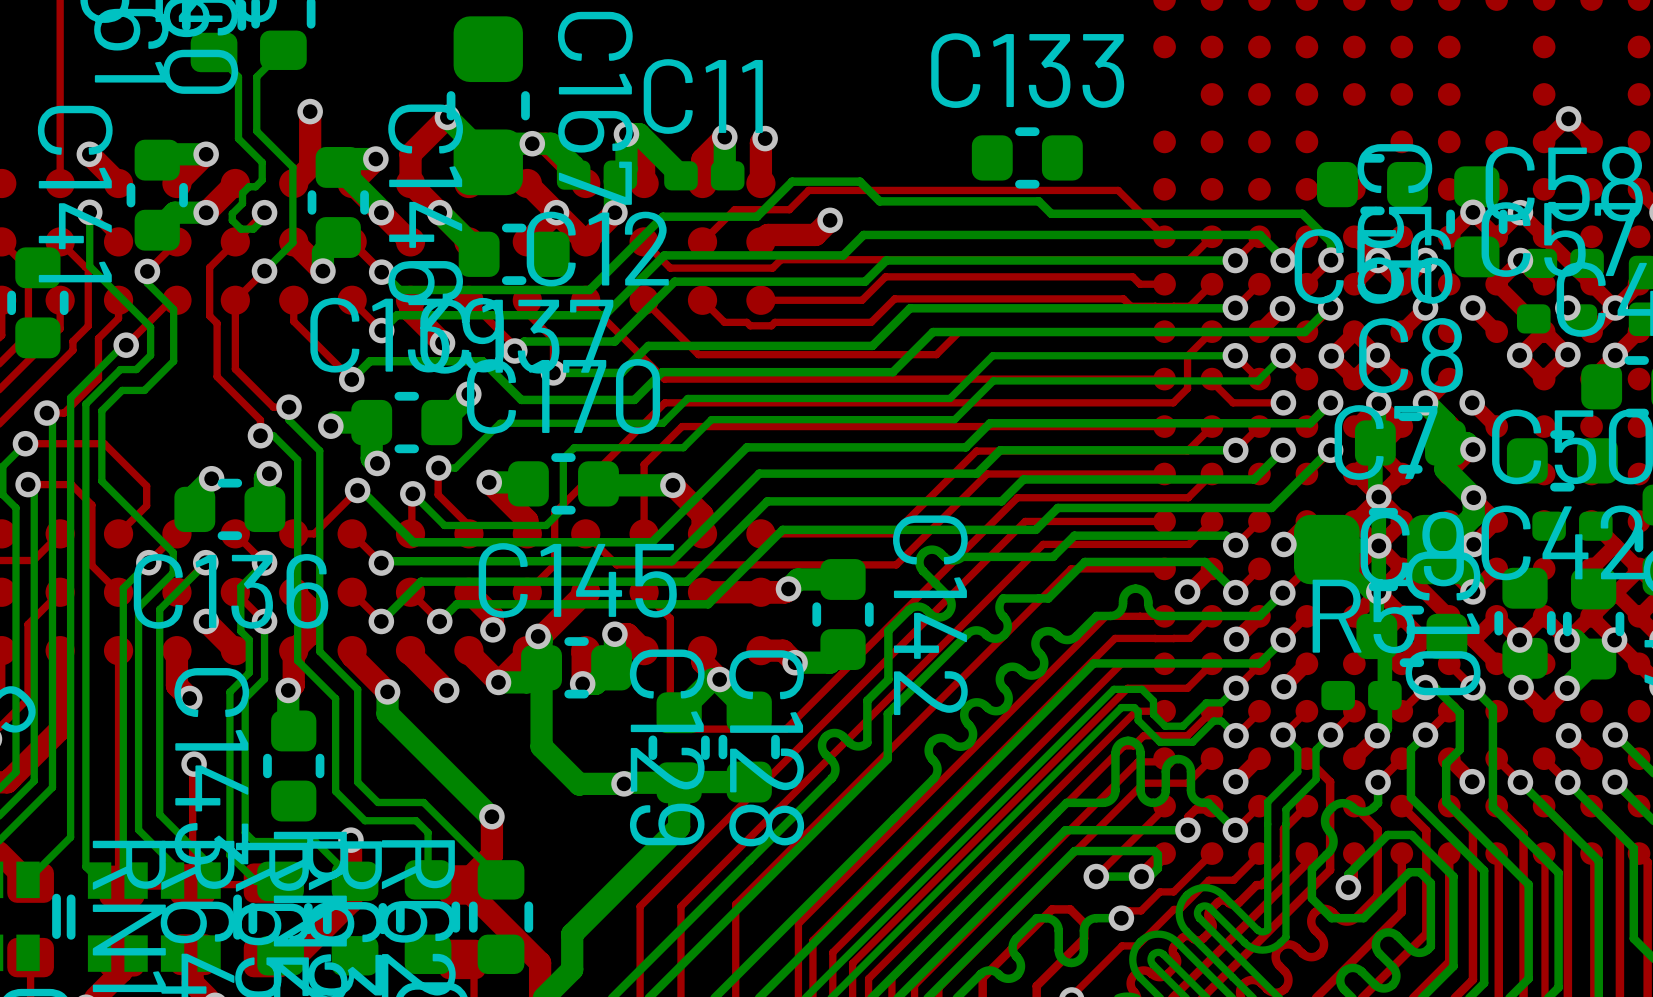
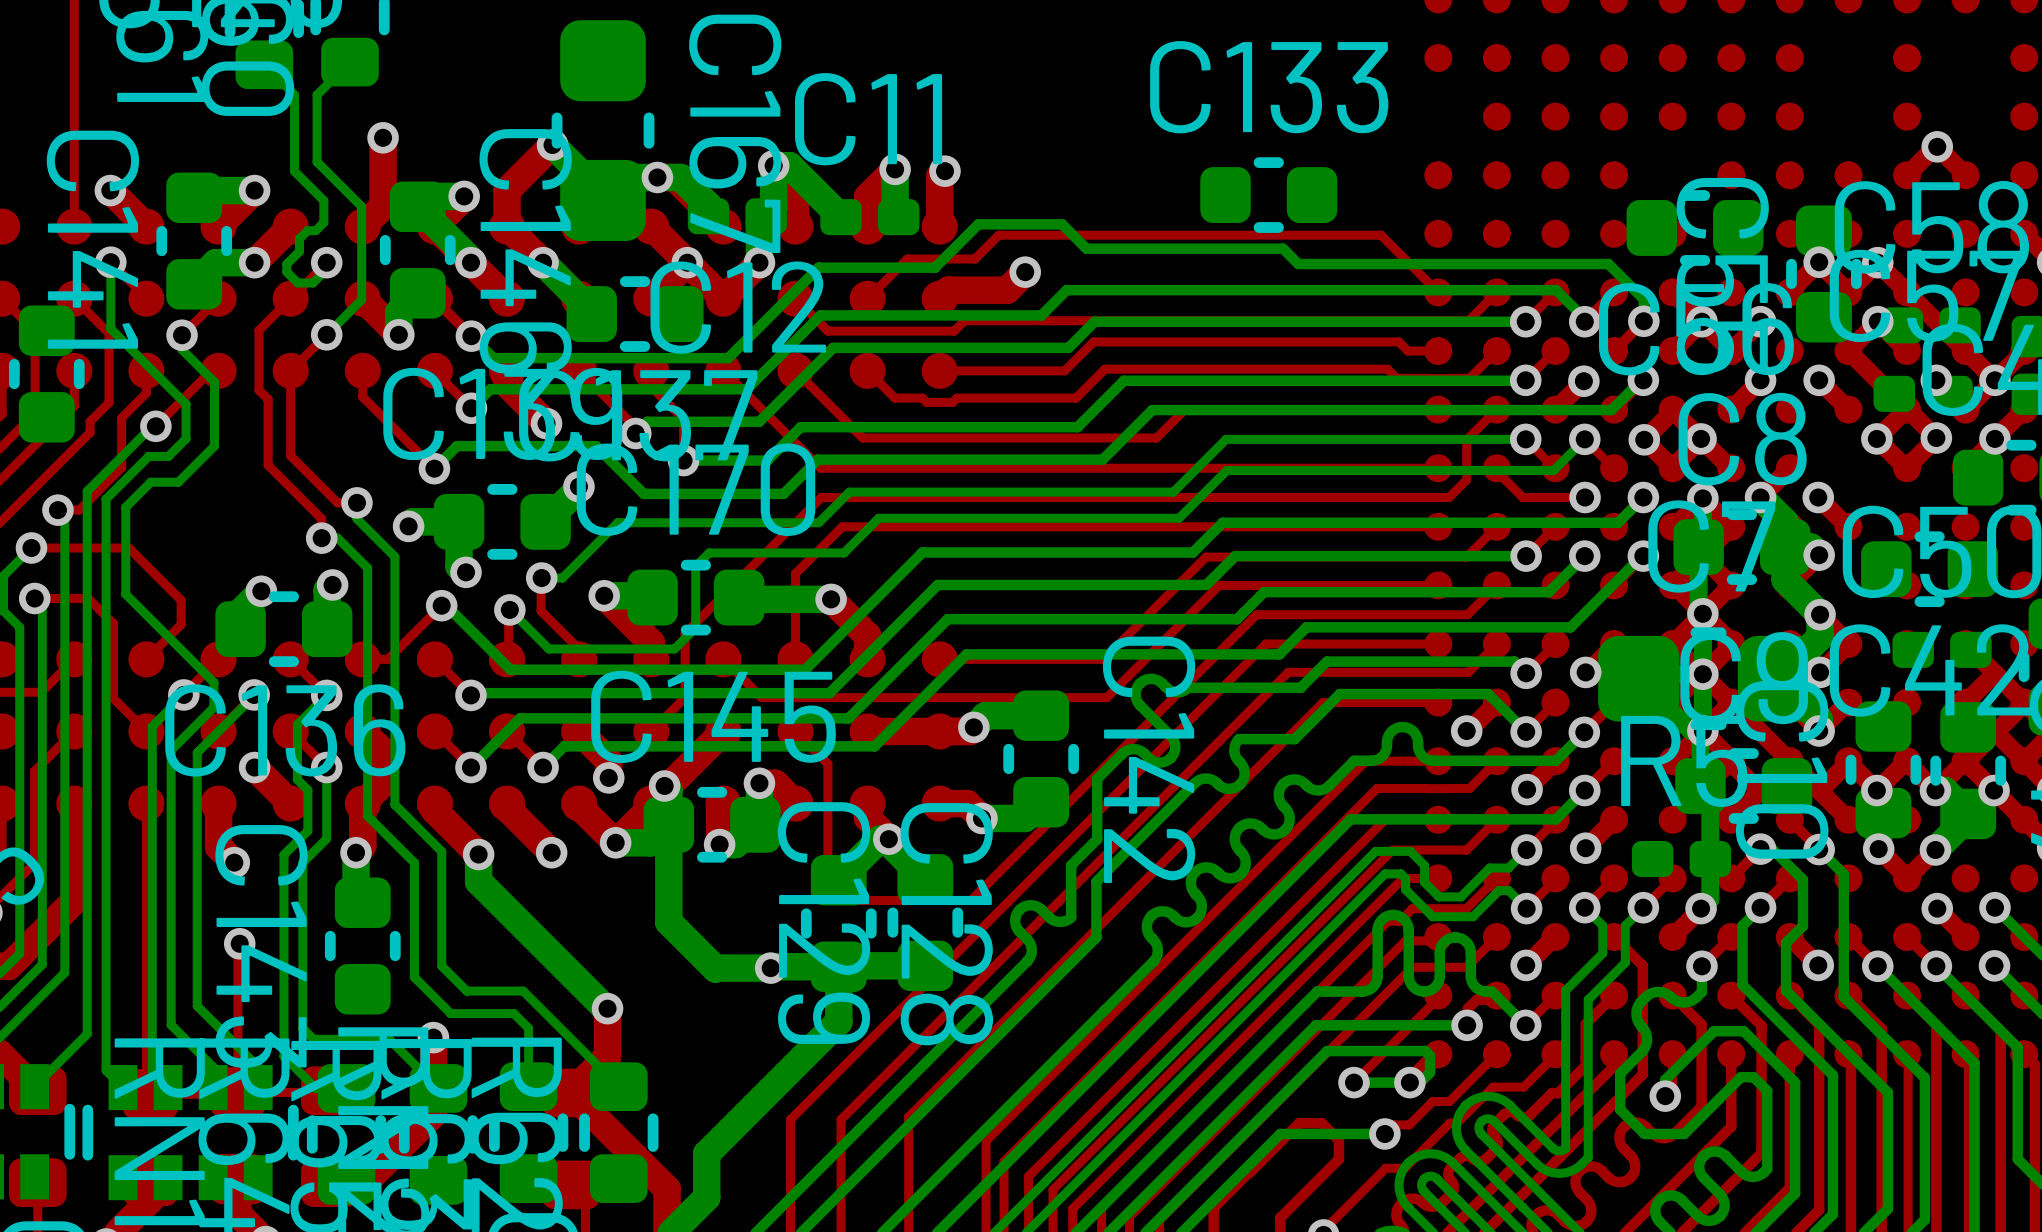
bottom track: (1096, 918) (1090, 919) (1085, 924) (1082, 955) (1077, 961) (1071, 962) (1065, 961) (1060, 956) (1057, 925) (1052, 919) (1046, 918) -> (1354, 1133) (1292, 1133)
bottom track: (1016, 938) (1012, 947) (1016, 956) -> none
bottom track: (1017, 957) (1020, 966) (1017, 975) (1008, 978) (999, 975) -> none
bottom track: (998, 974) (989, 970) (980, 974) -> (1255, 1159) (1211, 1203)

